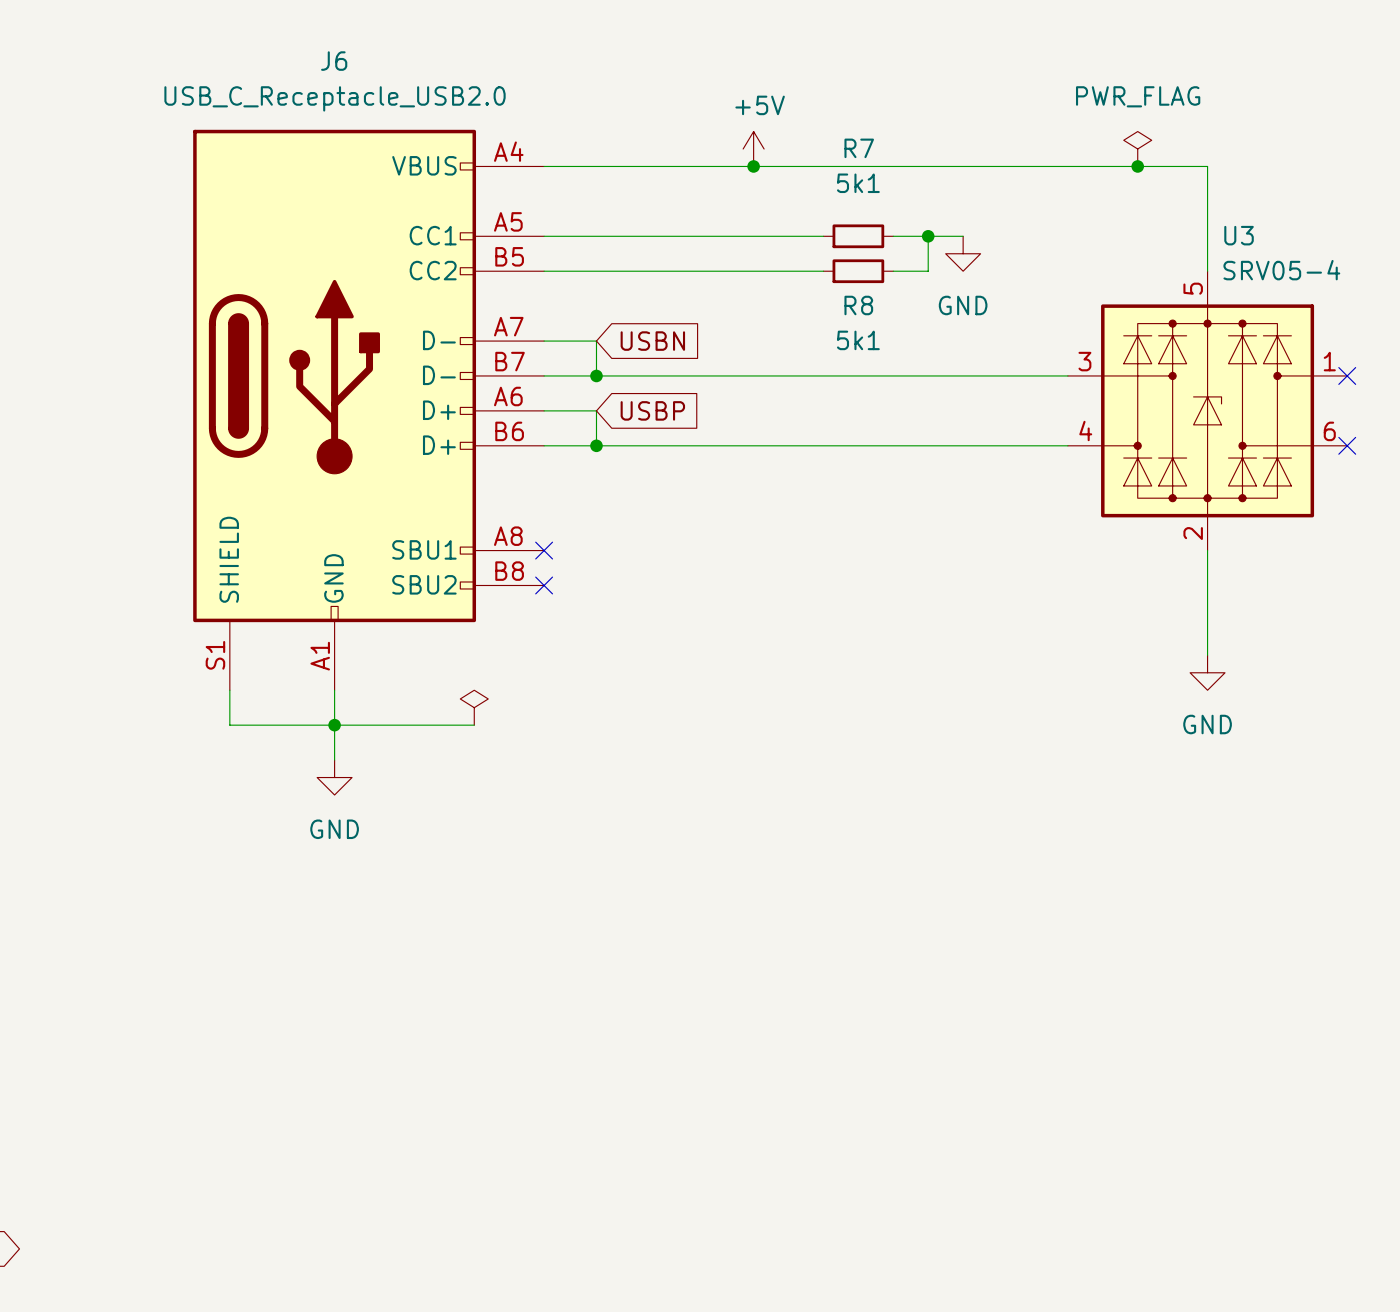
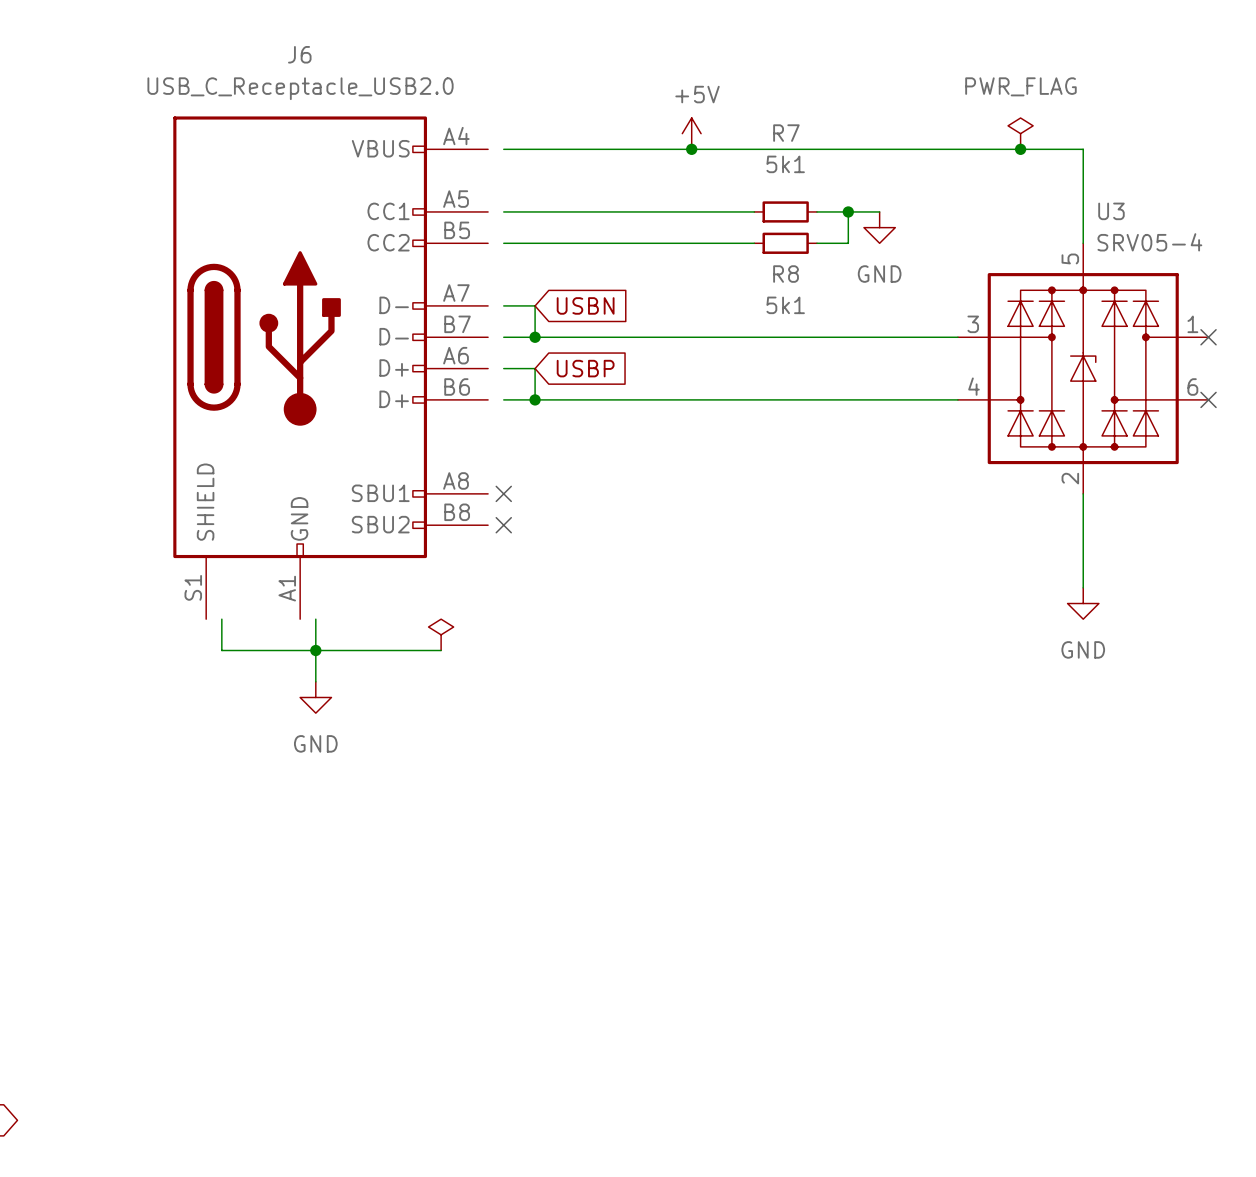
power symbol position: +5V (753, 149) -> +5V (691, 133)
wire: (544, 166) (561, 166) -> none
junction position: (753, 166) -> (691, 149)
wire: (544, 236) (561, 236) -> none
R7 position: (858, 236) -> (785, 211)
wire: (928, 236) (928, 271) -> (848, 211) (848, 243) (832, 243)
junction position: (928, 236) -> (848, 211)
wire: none -> (863, 211) (879, 211)
power symbol position: GND (963, 253) -> GND (879, 227)
wire: (544, 271) (561, 271) -> none
R8 position: (858, 271) -> (785, 243)
wire: (544, 341) (561, 341) -> none
wire: (544, 375) (561, 375) -> none
wire: (544, 410) (561, 410) -> none
wire: (544, 445) (561, 445) -> (425, 650) (441, 650)
no-connect mark position: (544, 550) -> (503, 493)
no-connect mark position: (544, 585) -> (503, 525)
wire: (229, 690) (229, 725) (247, 725) -> (221, 619) (221, 650)
wire: (334, 690) (334, 760) -> (315, 619) (315, 681)
power symbol position: (474, 707) -> (441, 634)
junction position: (334, 725) -> (315, 650)
power symbol position: GND (334, 777) -> GND (315, 697)

